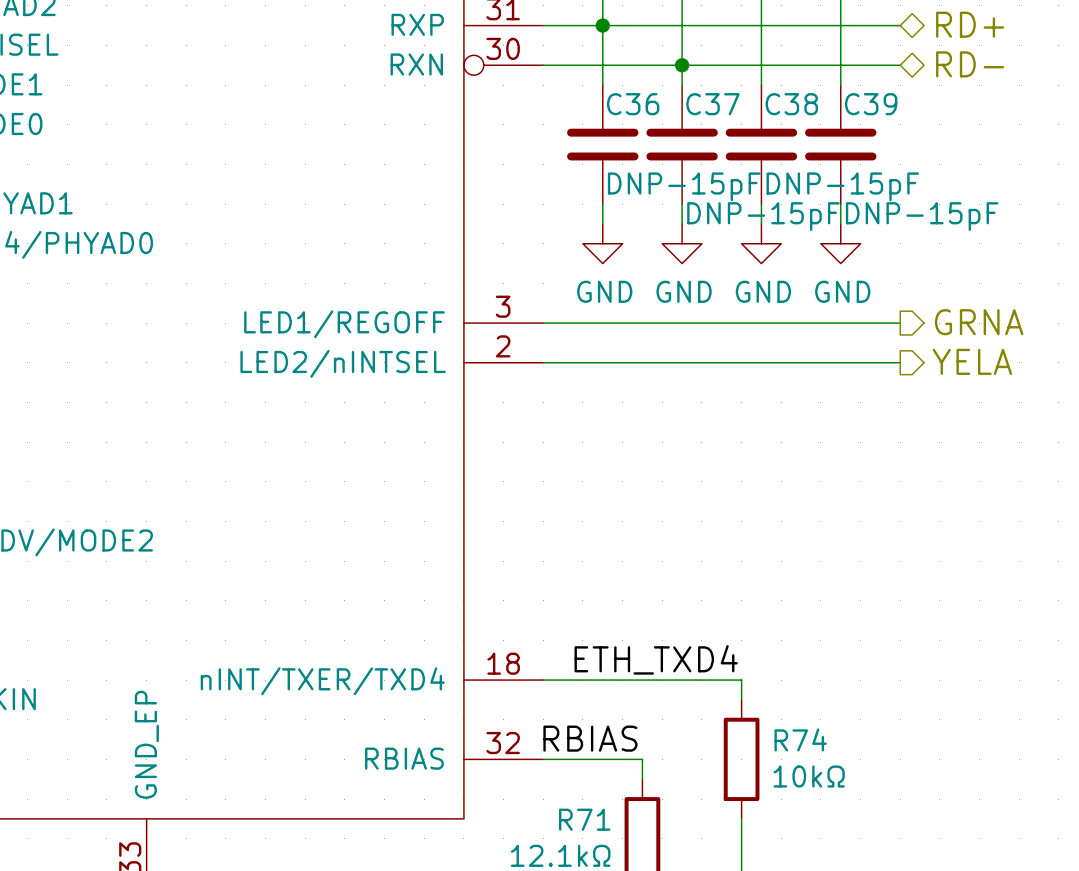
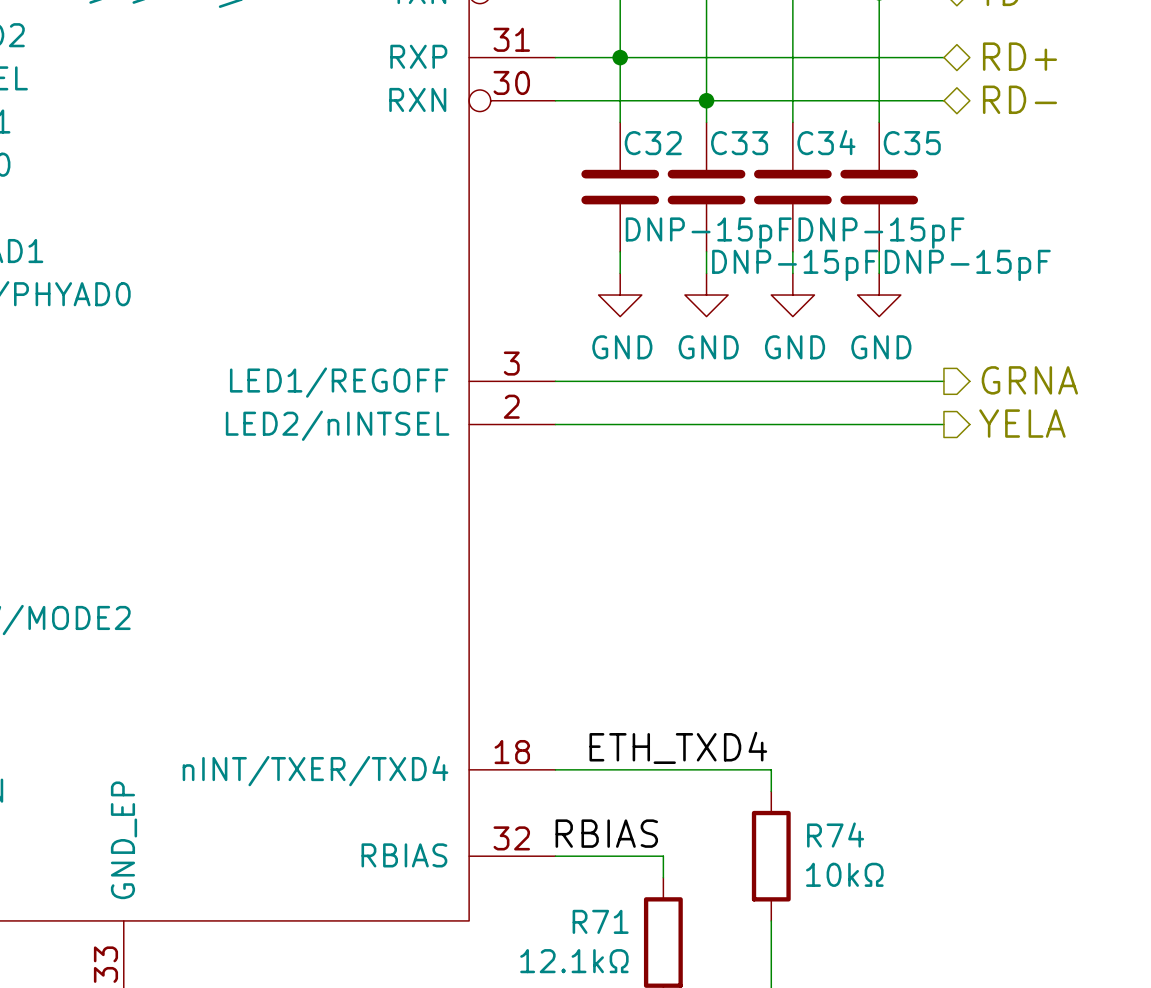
C36 name: C36 (633, 104) -> C32 (653, 143)
C37 name: C37 (712, 104) -> C33 (739, 143)
C38 name: C38 (791, 104) -> C34 (826, 142)
C39 name: C39 (871, 104) -> C35 (912, 143)

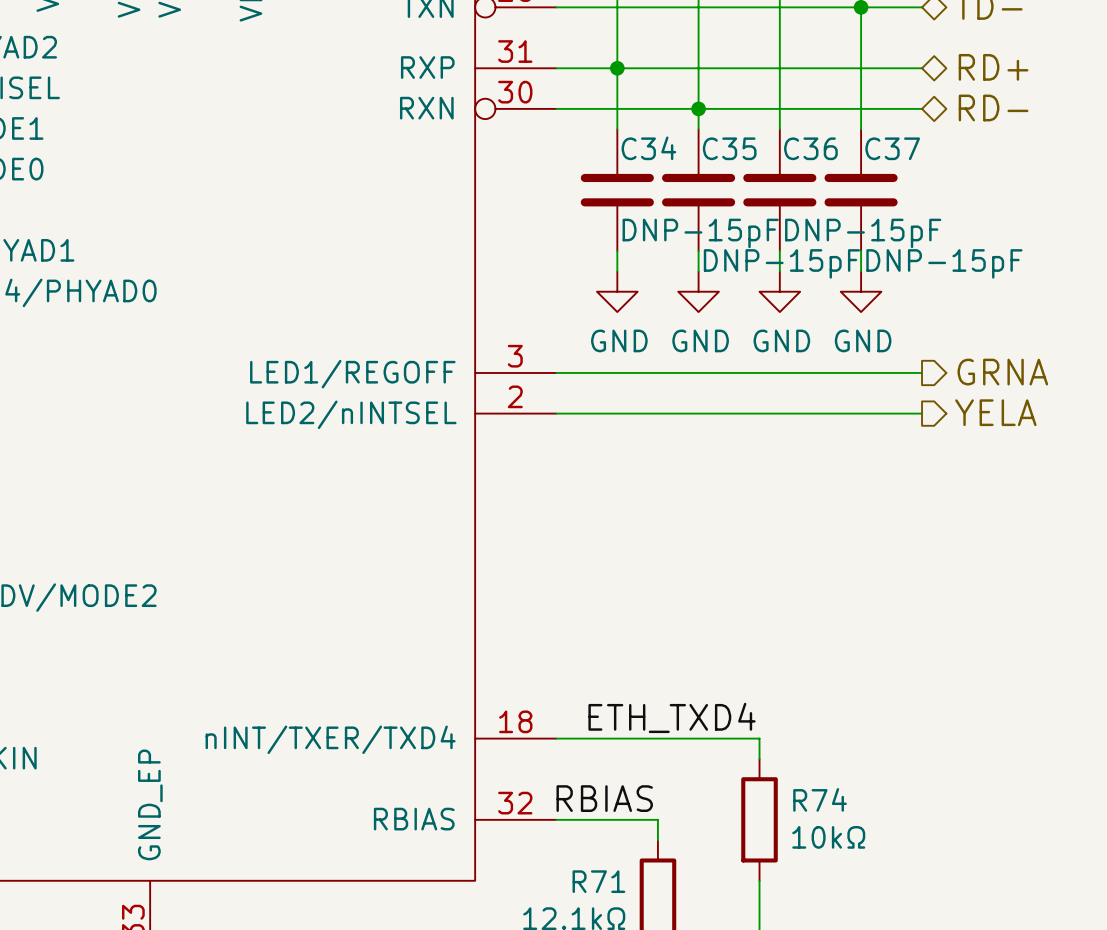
C34 name: C34 (826, 142) -> C36 (810, 148)
C32 name: C32 (653, 143) -> C34 (648, 148)
C33 name: C33 (739, 143) -> C35 (729, 148)
C35 name: C35 (912, 143) -> C37 (892, 148)

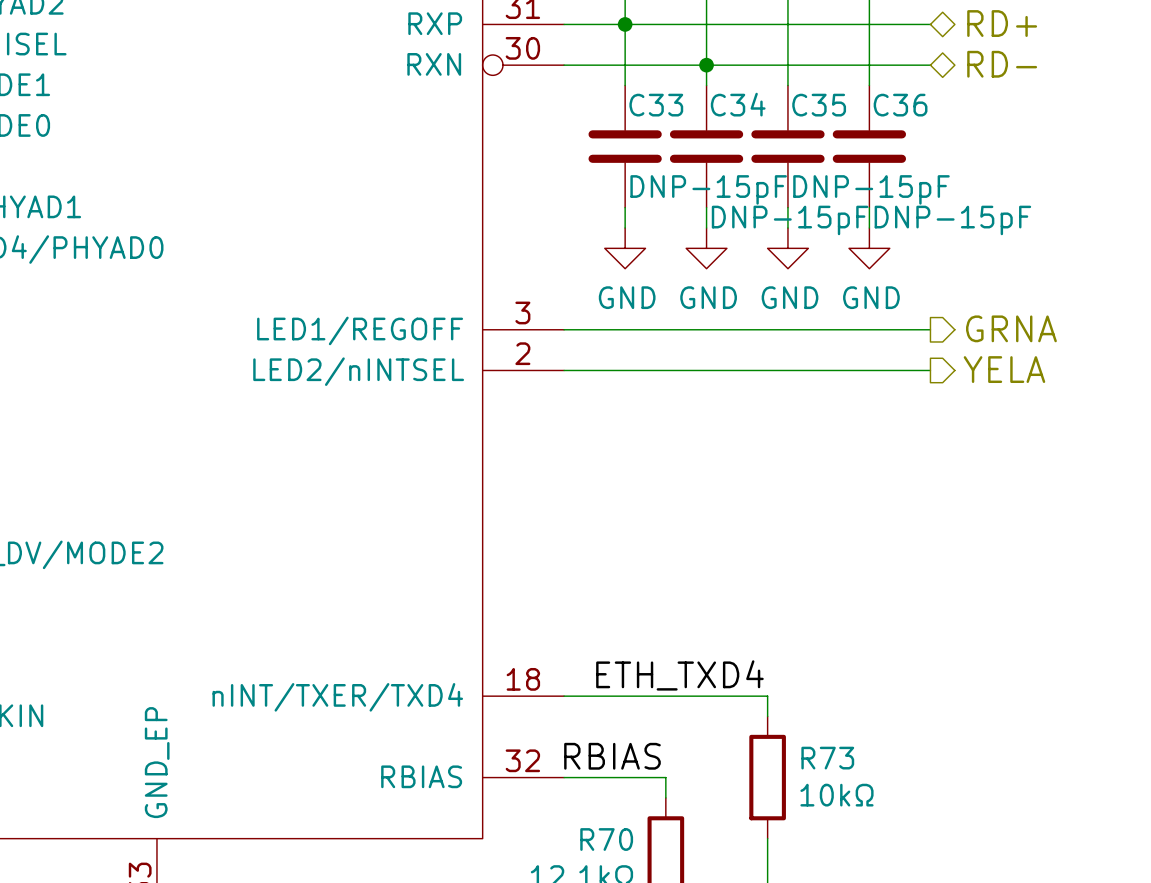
C34 name: C34 (648, 148) -> C33 (656, 105)
C35 name: C35 (729, 148) -> C34 (738, 104)
C36 name: C36 (810, 148) -> C35 (819, 105)
C37 name: C37 (892, 148) -> C36 (900, 105)
R74 name: R74 (820, 799) -> R73 (827, 758)
R71 name: R71 (598, 881) -> R70 (606, 839)

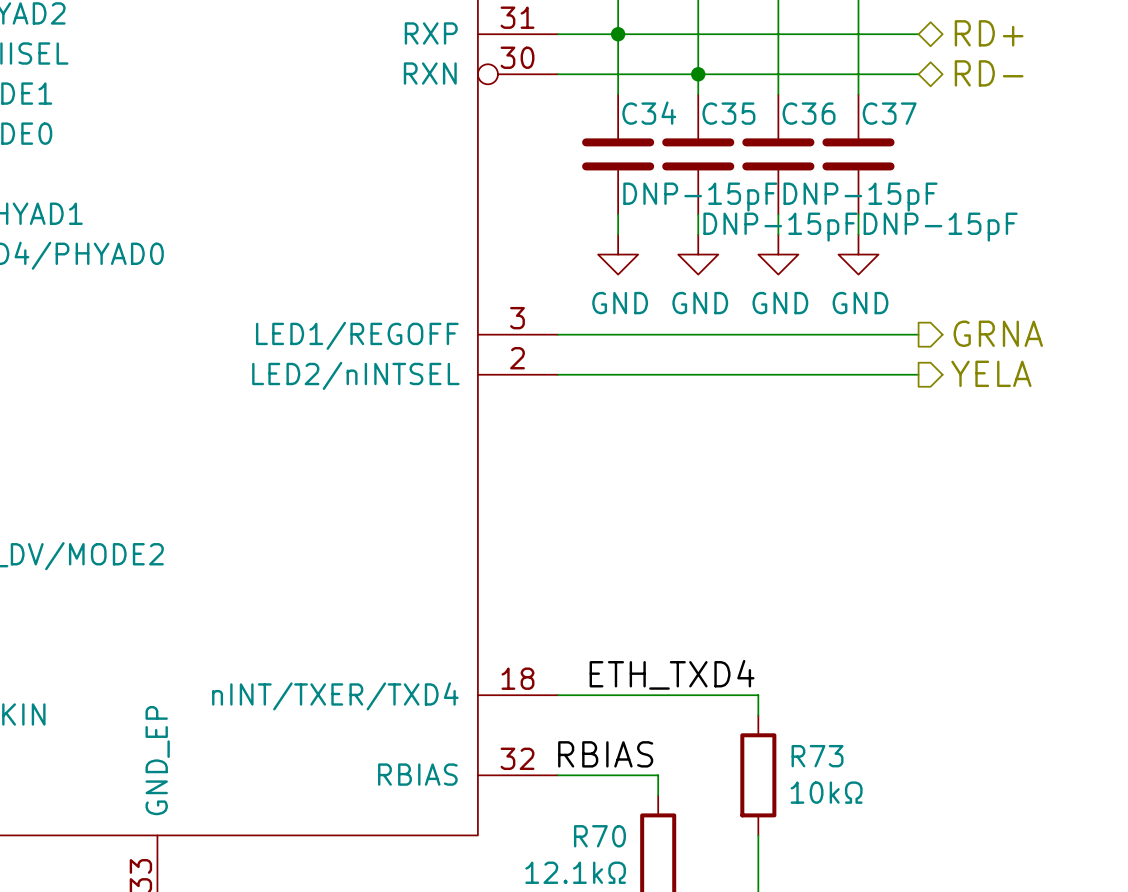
C34 name: C34 (738, 104) -> C35 (728, 113)
C33 name: C33 (656, 105) -> C34 (649, 113)
C35 name: C35 (819, 105) -> C36 (809, 113)
C36 name: C36 (900, 105) -> C37 (889, 113)

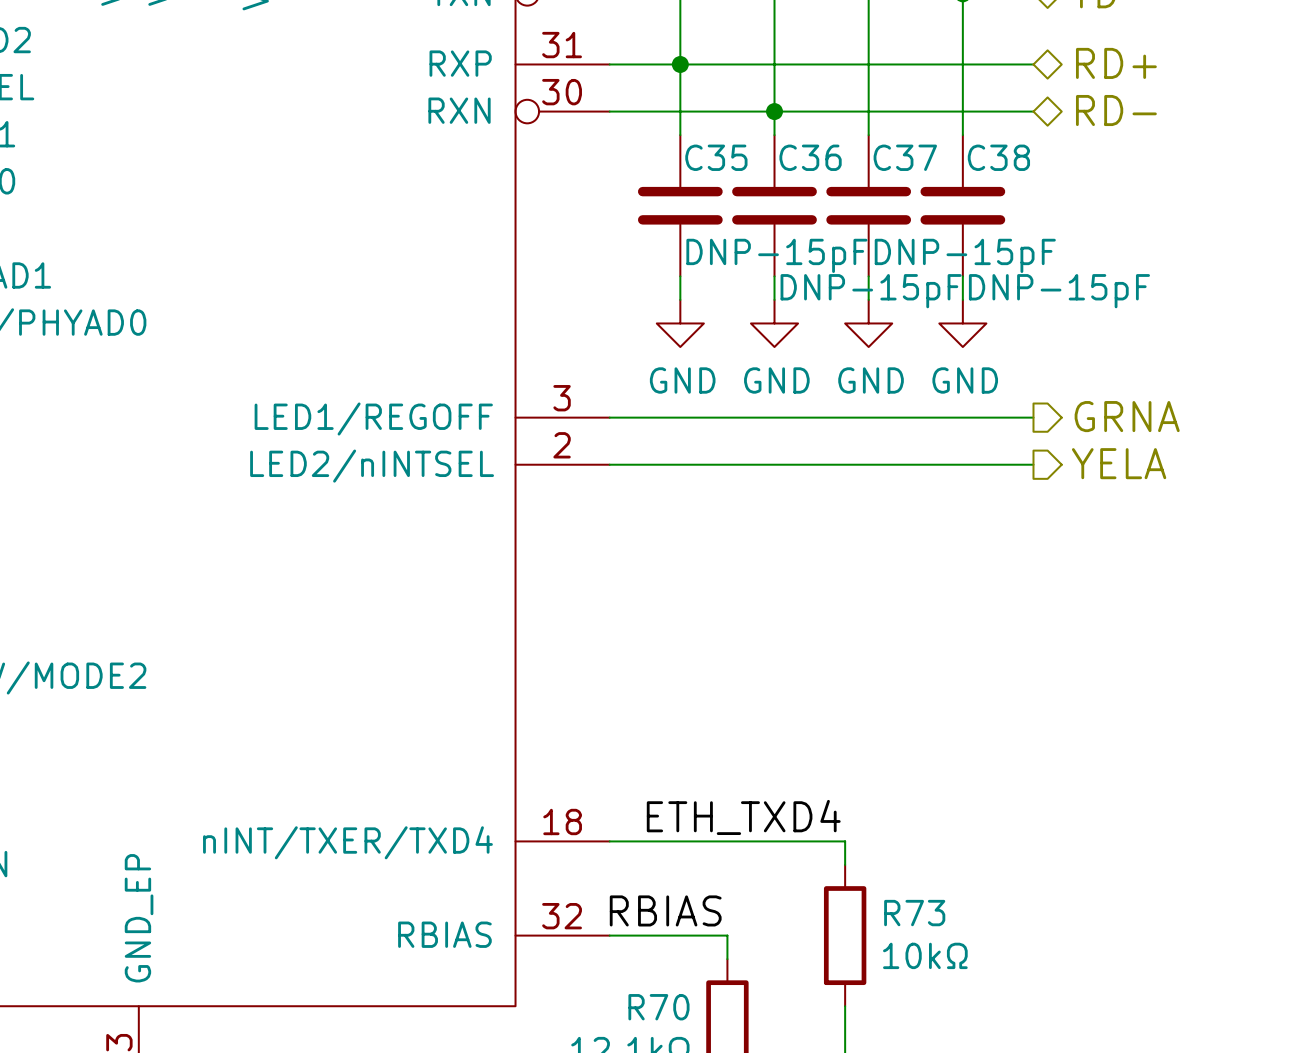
C34 name: C34 (649, 113) -> C35 (716, 157)
C35 name: C35 (728, 113) -> C36 (810, 157)
C36 name: C36 (809, 113) -> C37 (905, 157)
C37 name: C37 (889, 113) -> C38 (998, 157)

